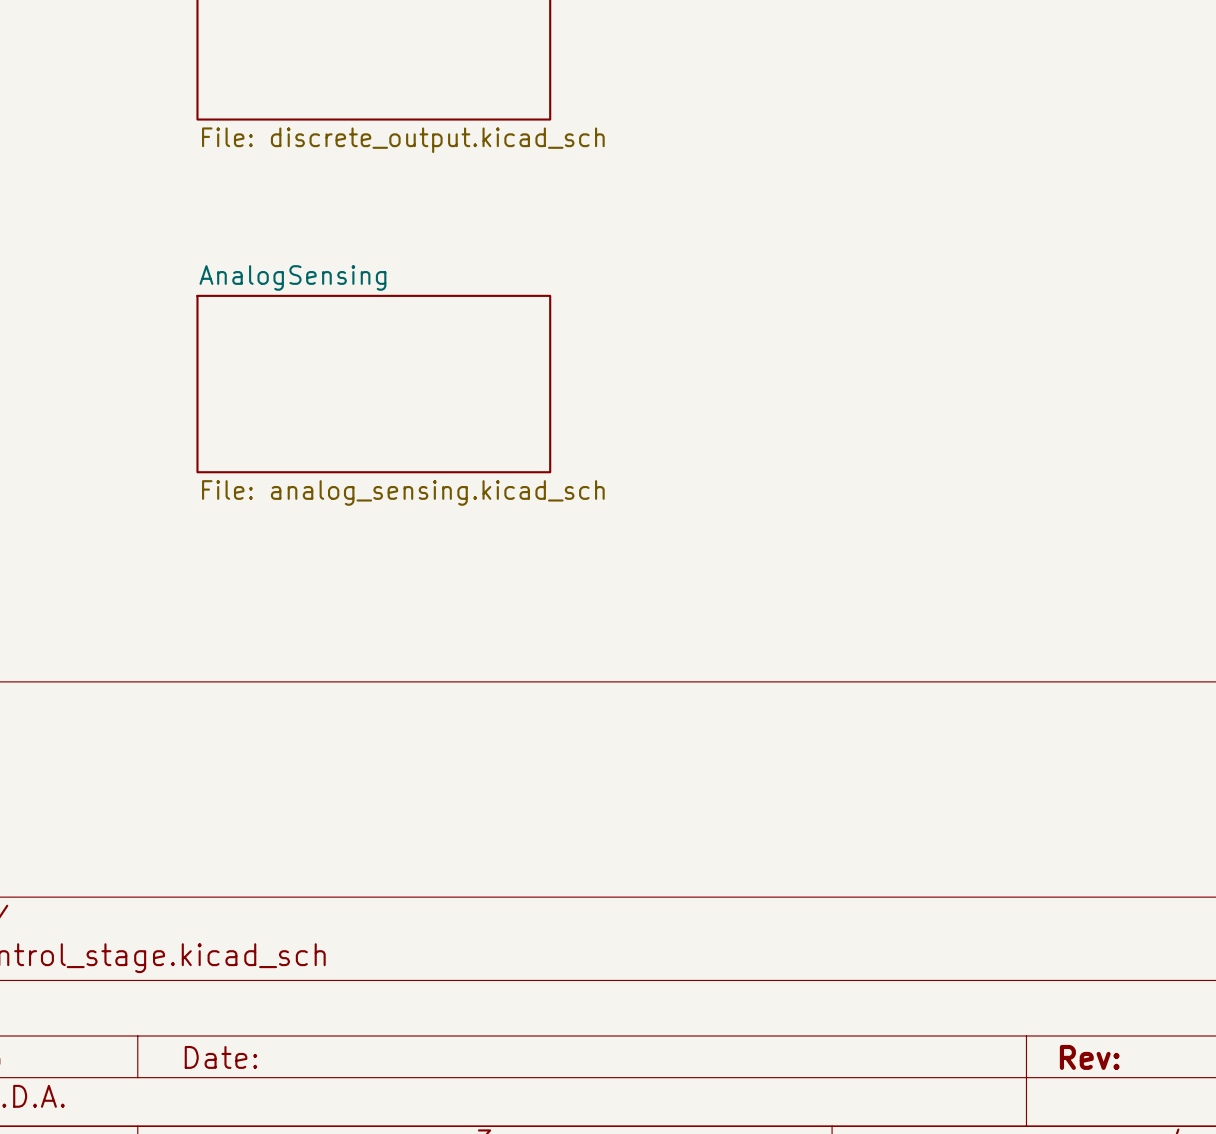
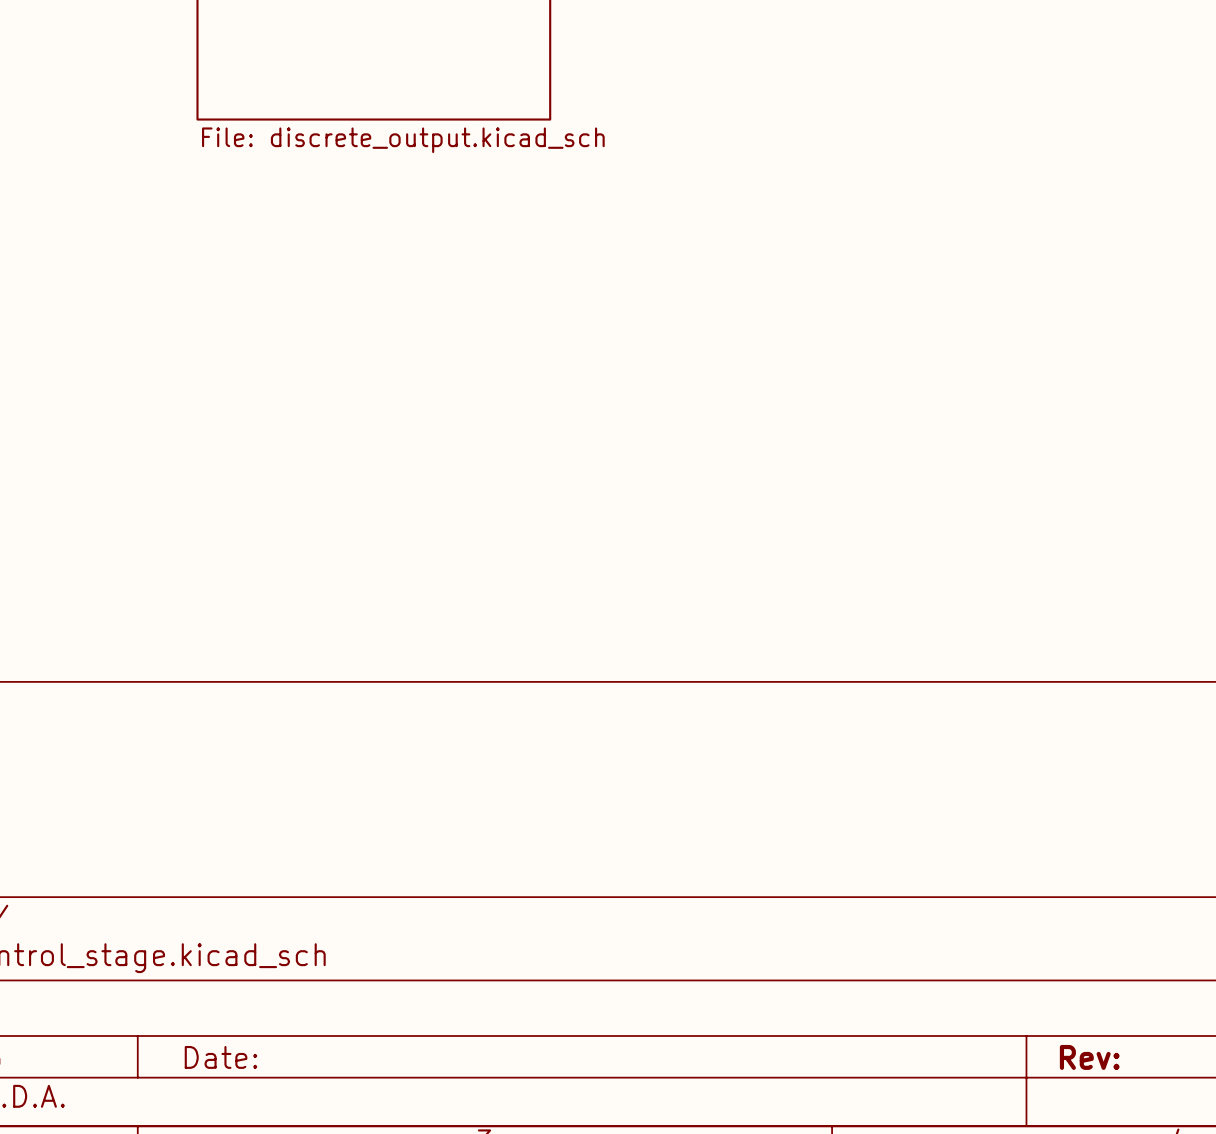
sheet AnalogSensing: File: analog_sensing.kicad_sch (373, 384) -> none

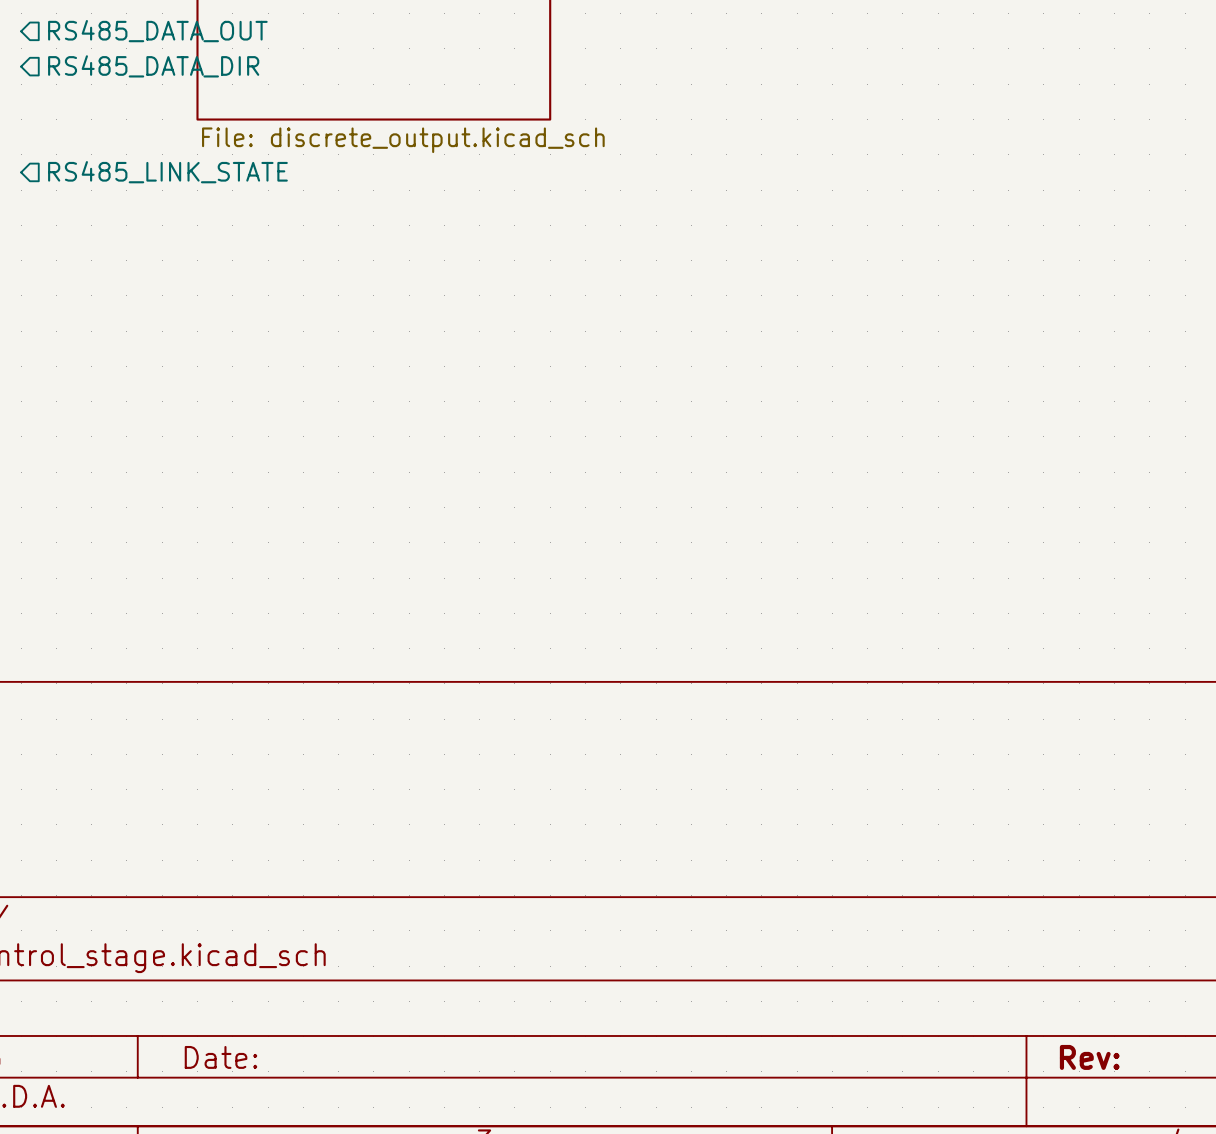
sheet pin: none -> RS485_DATA_OUT (157, 31)
sheet pin: none -> RS485_DATA_DIR (153, 66)
sheet pin: none -> RS485_LINK_STATE (167, 172)

